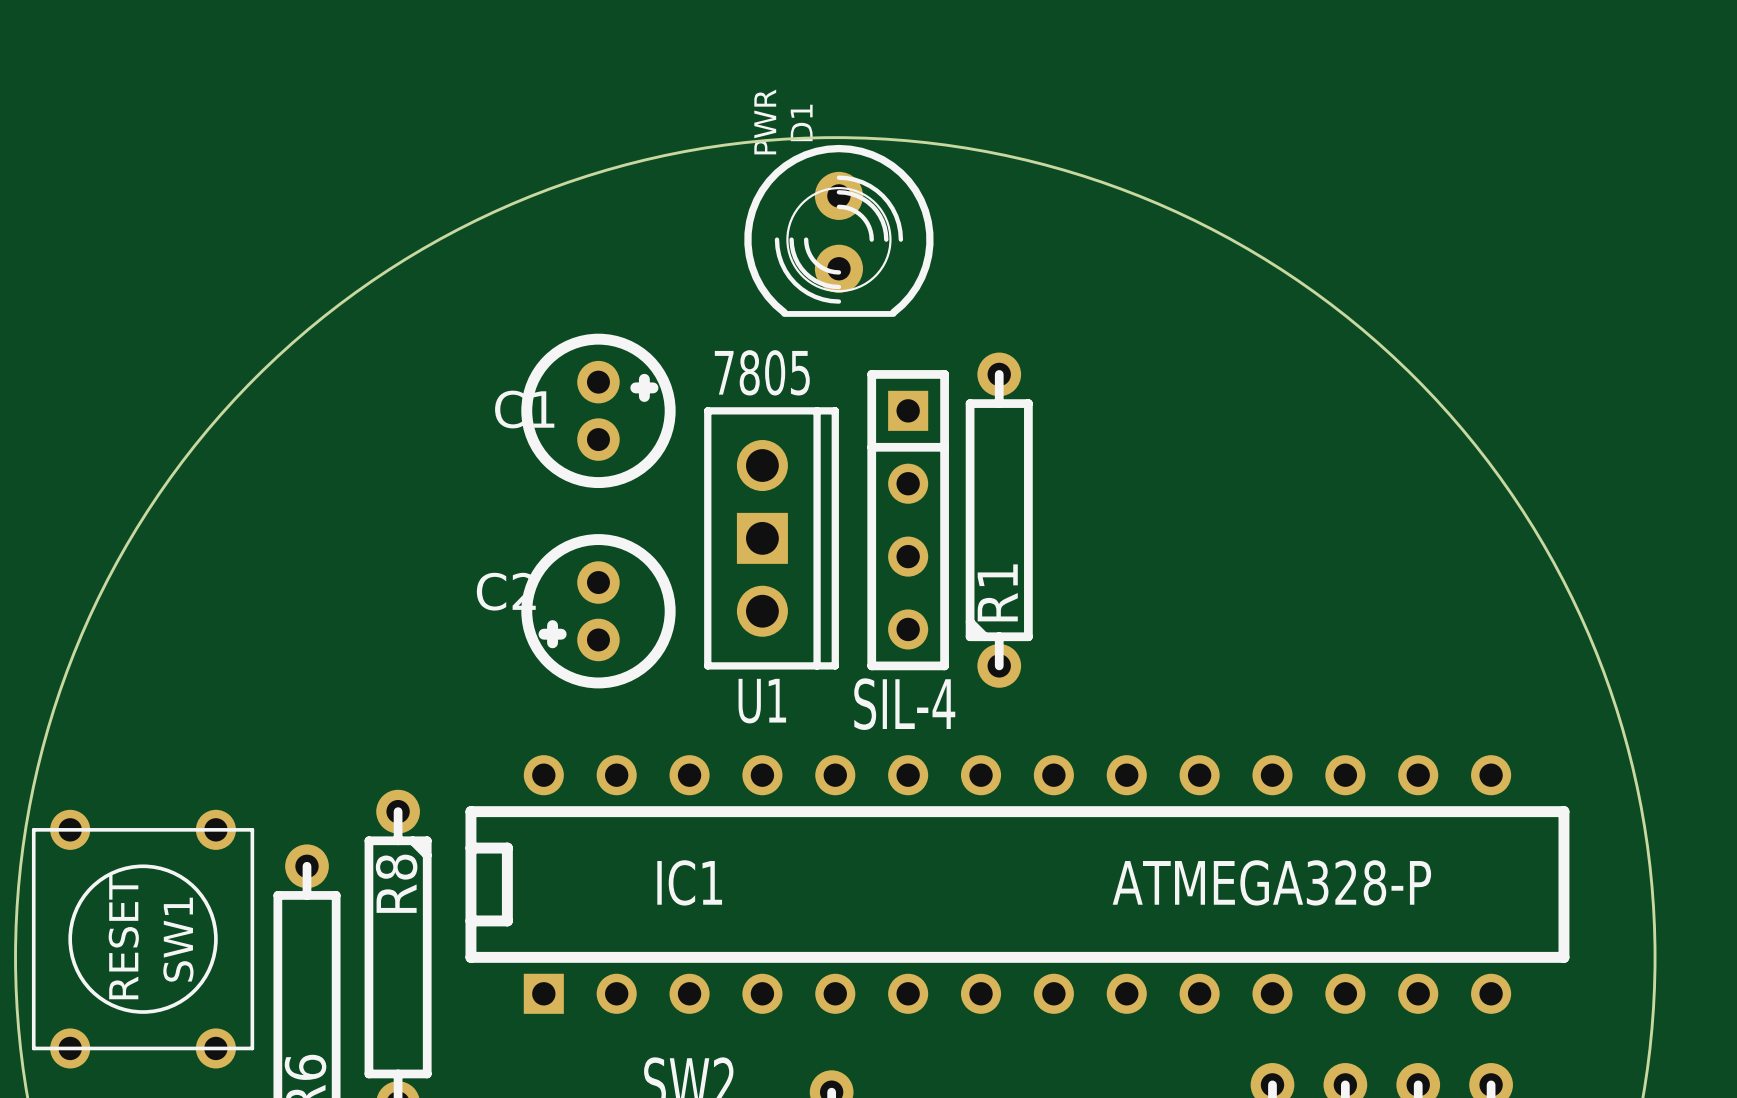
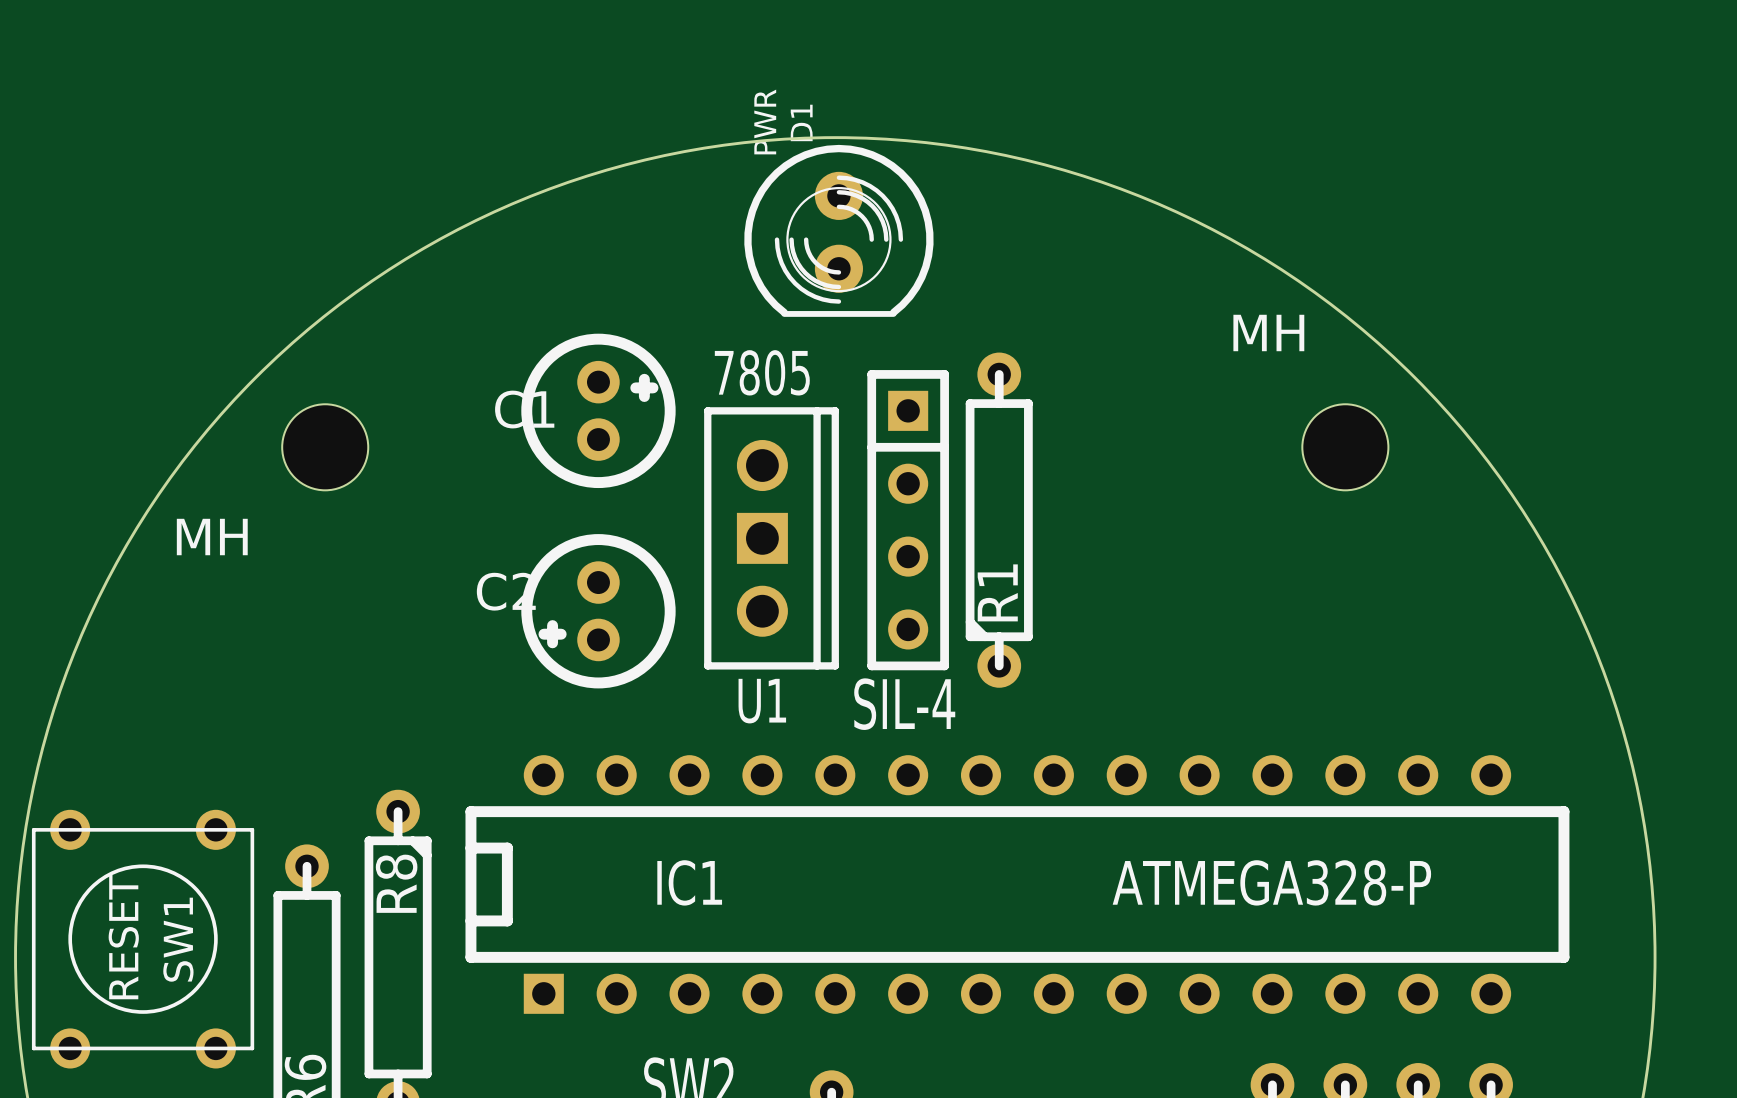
MH: none -> (325, 447)
MH: none -> (1345, 447)

